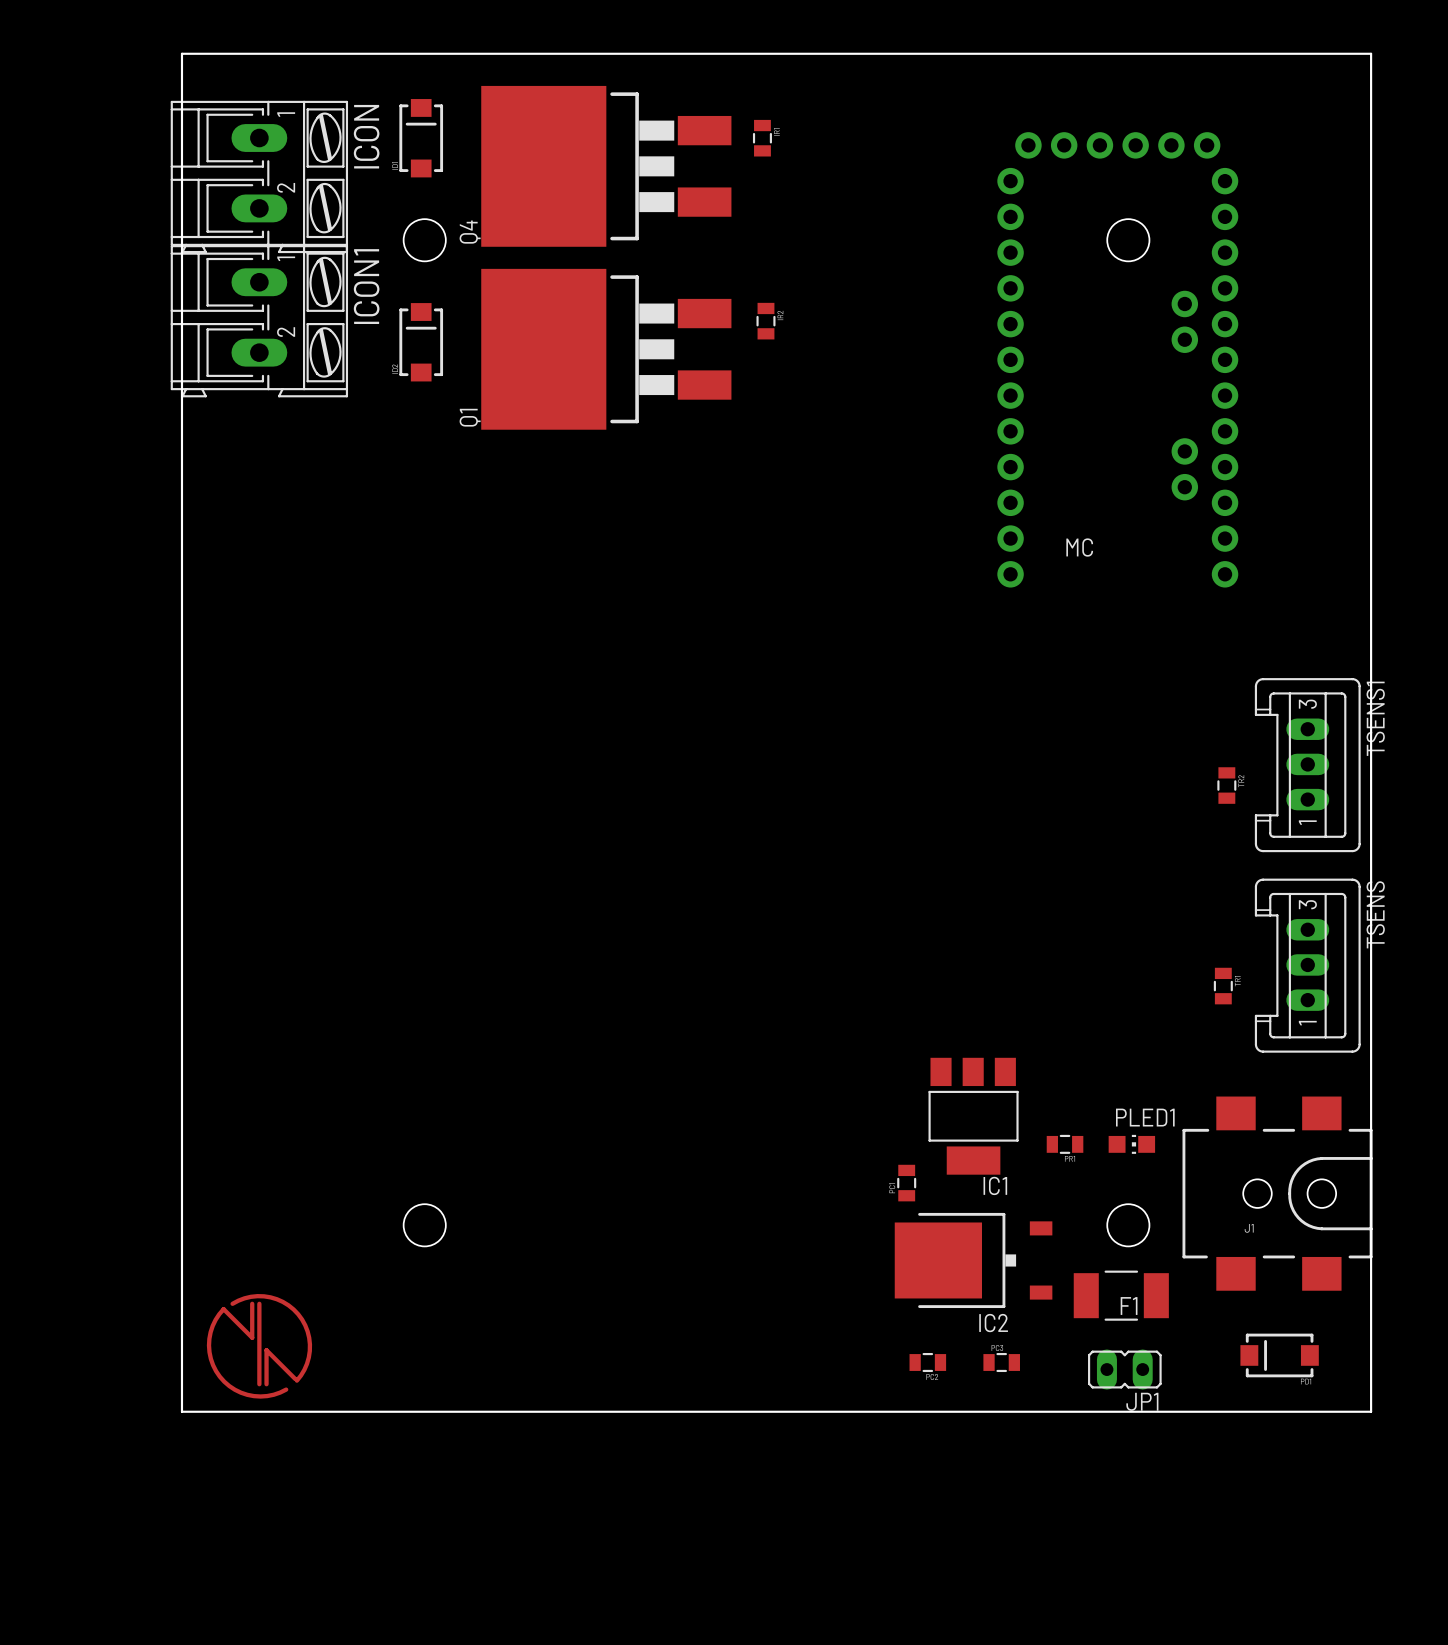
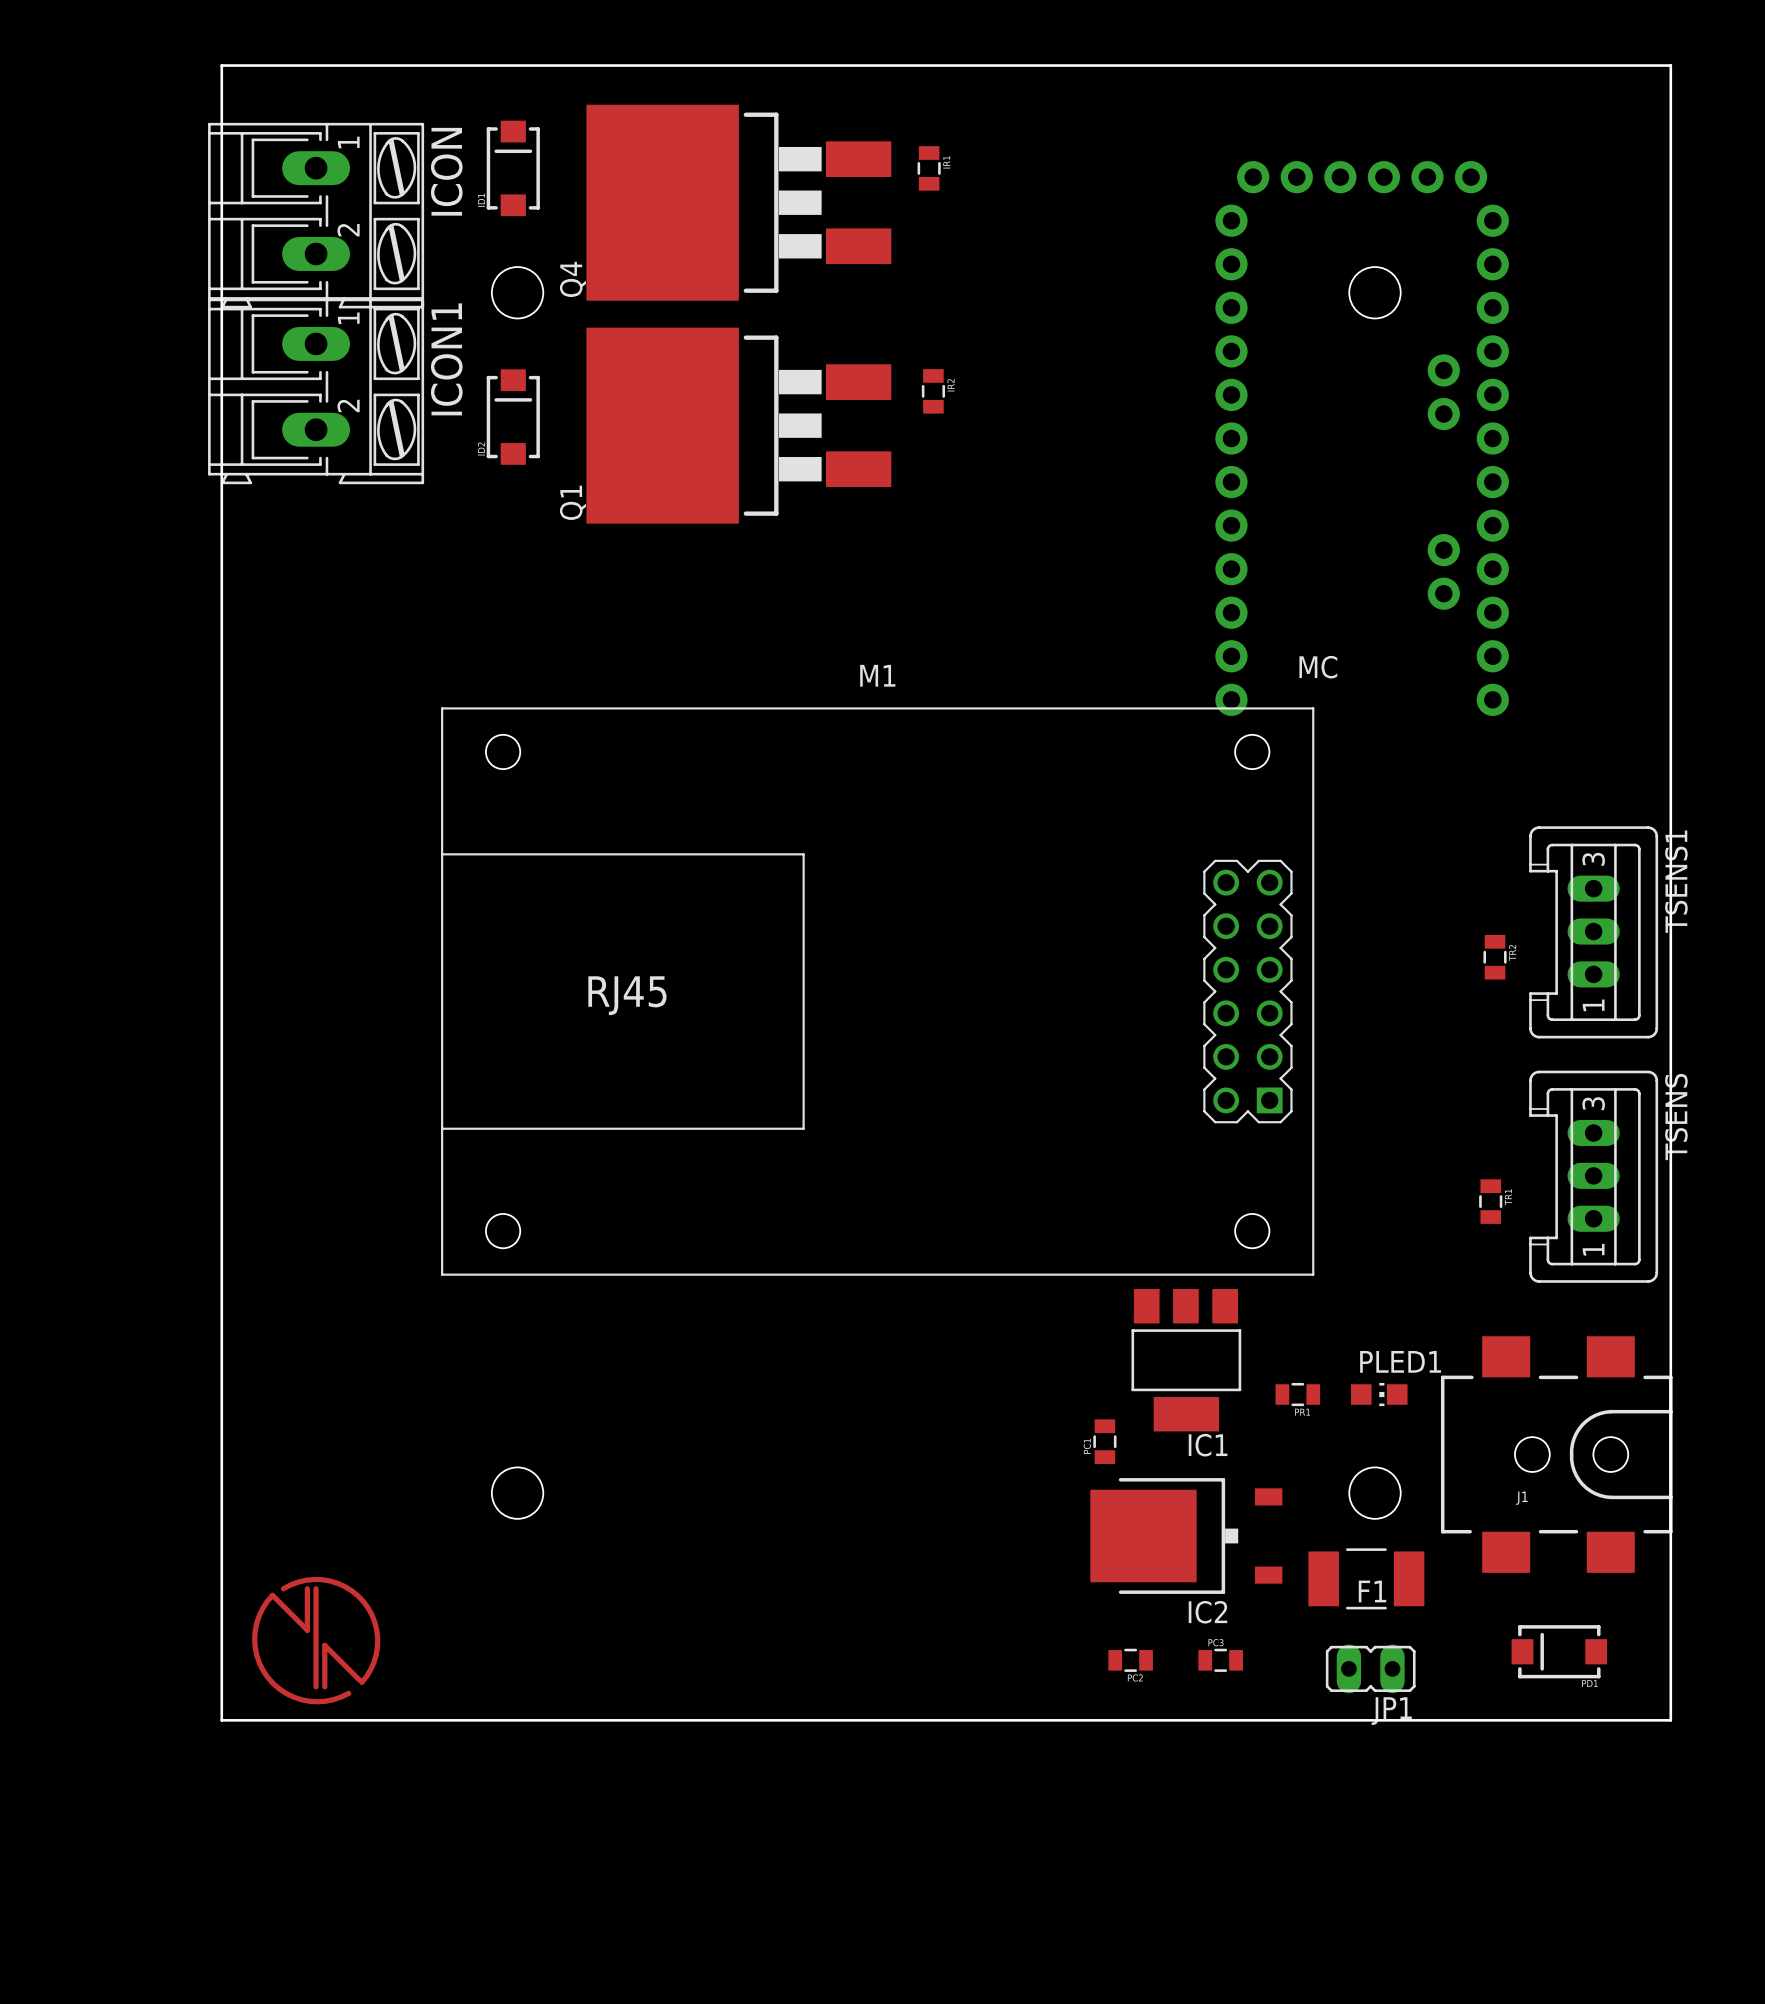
M1: none -> (877, 991)

